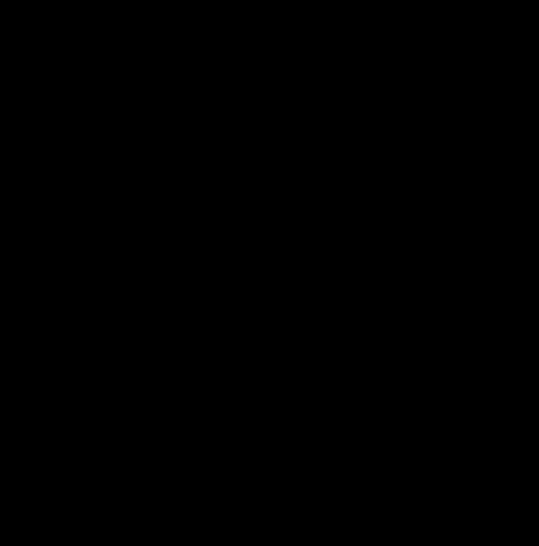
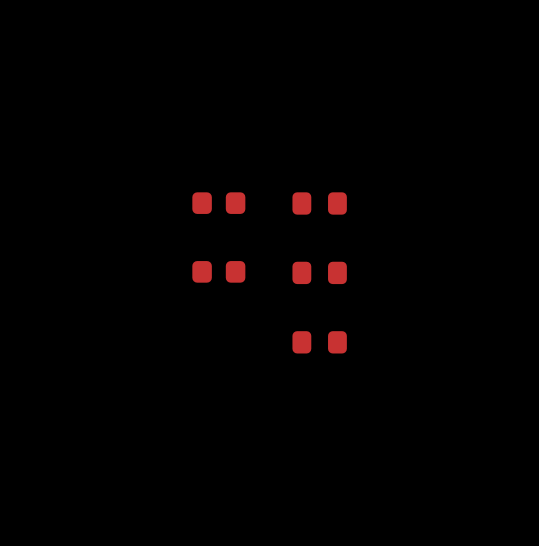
part: none -> (218, 203)
part: none -> (319, 203)
part: none -> (218, 271)
part: none -> (319, 272)
part: none -> (319, 342)

